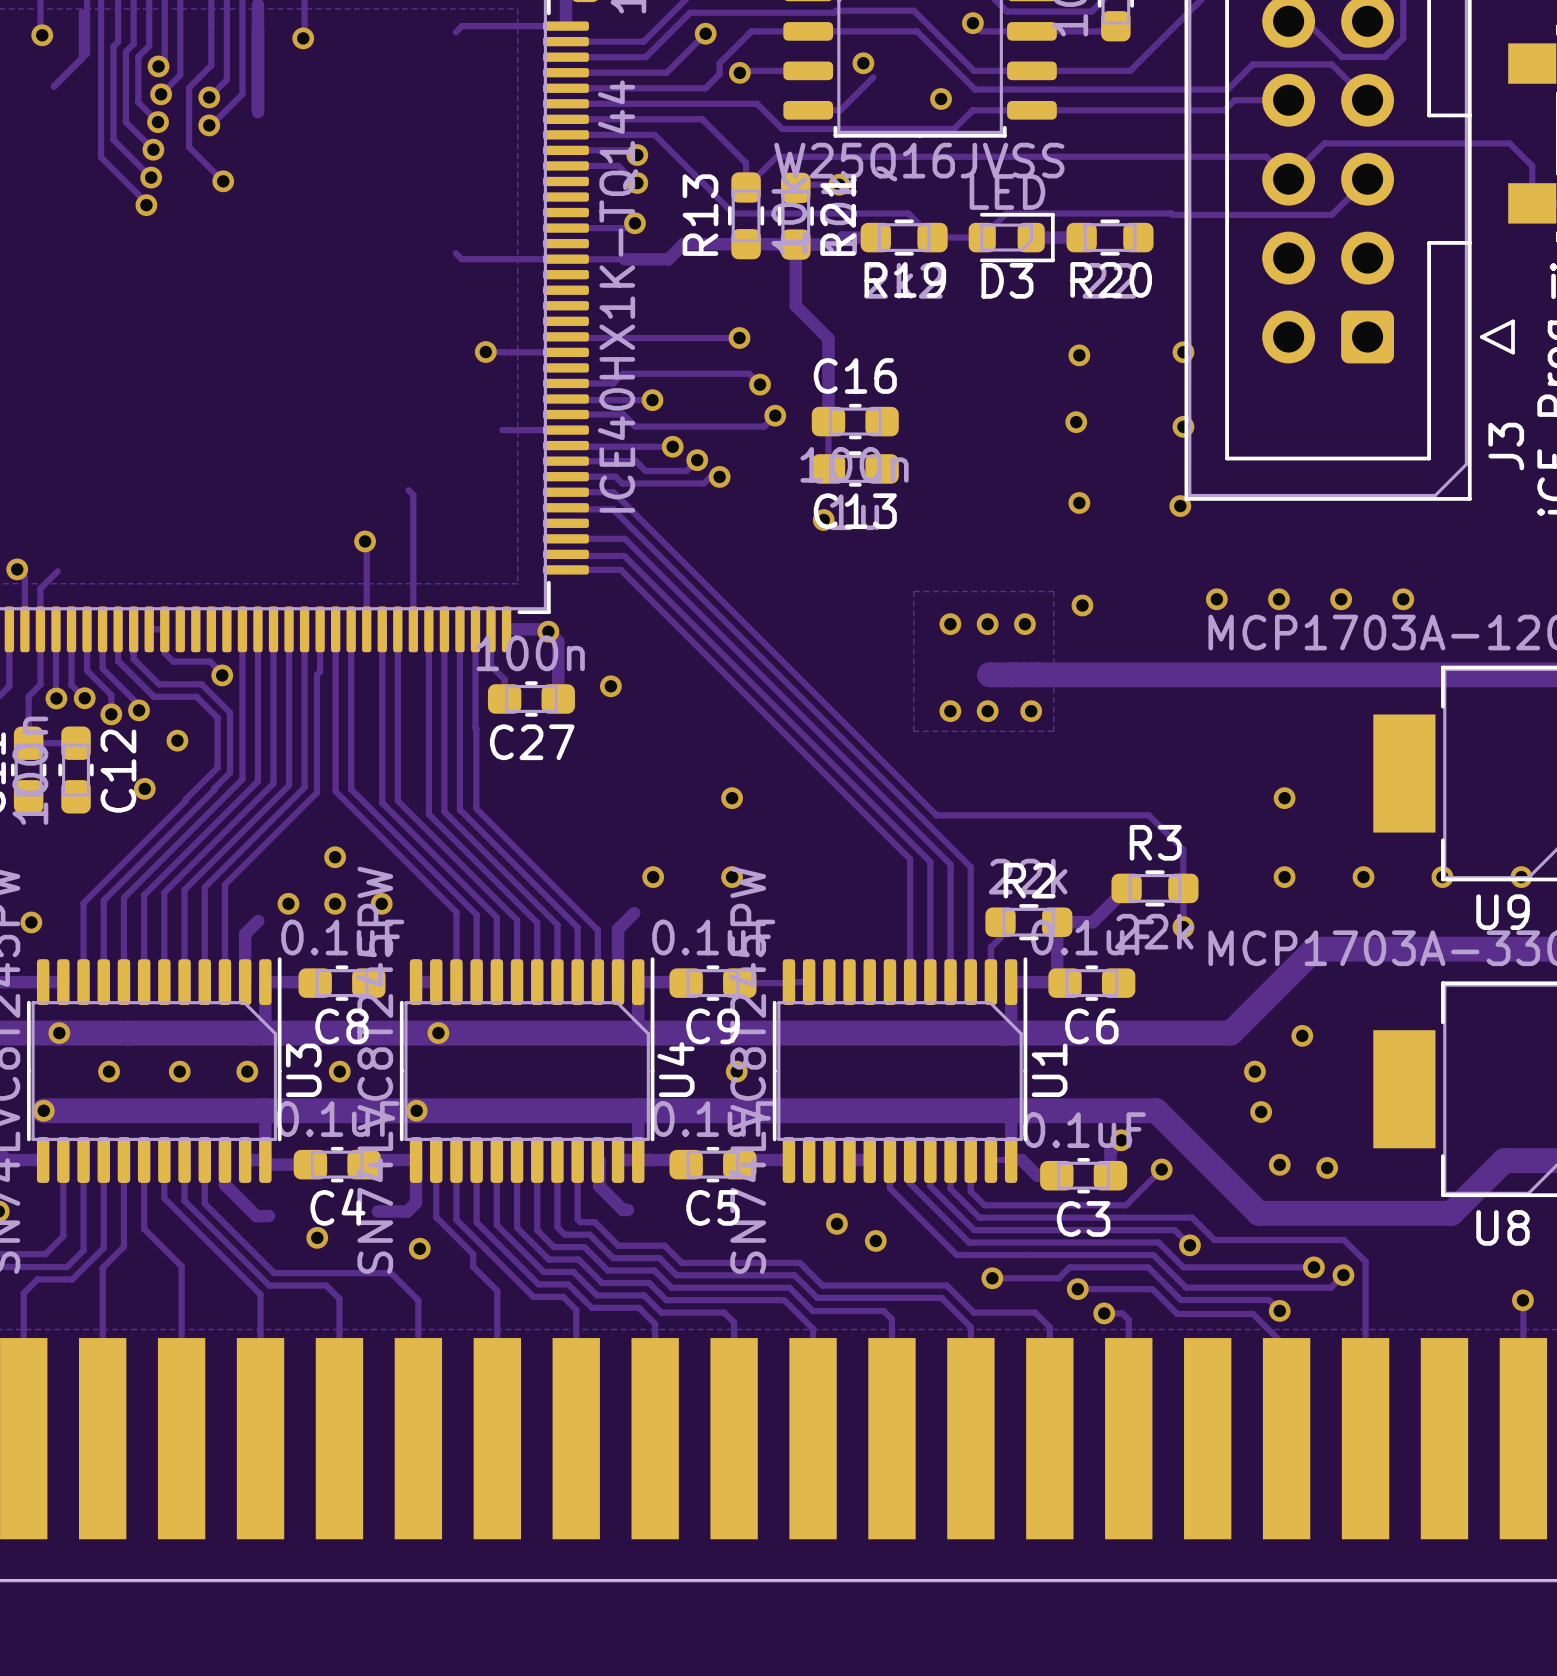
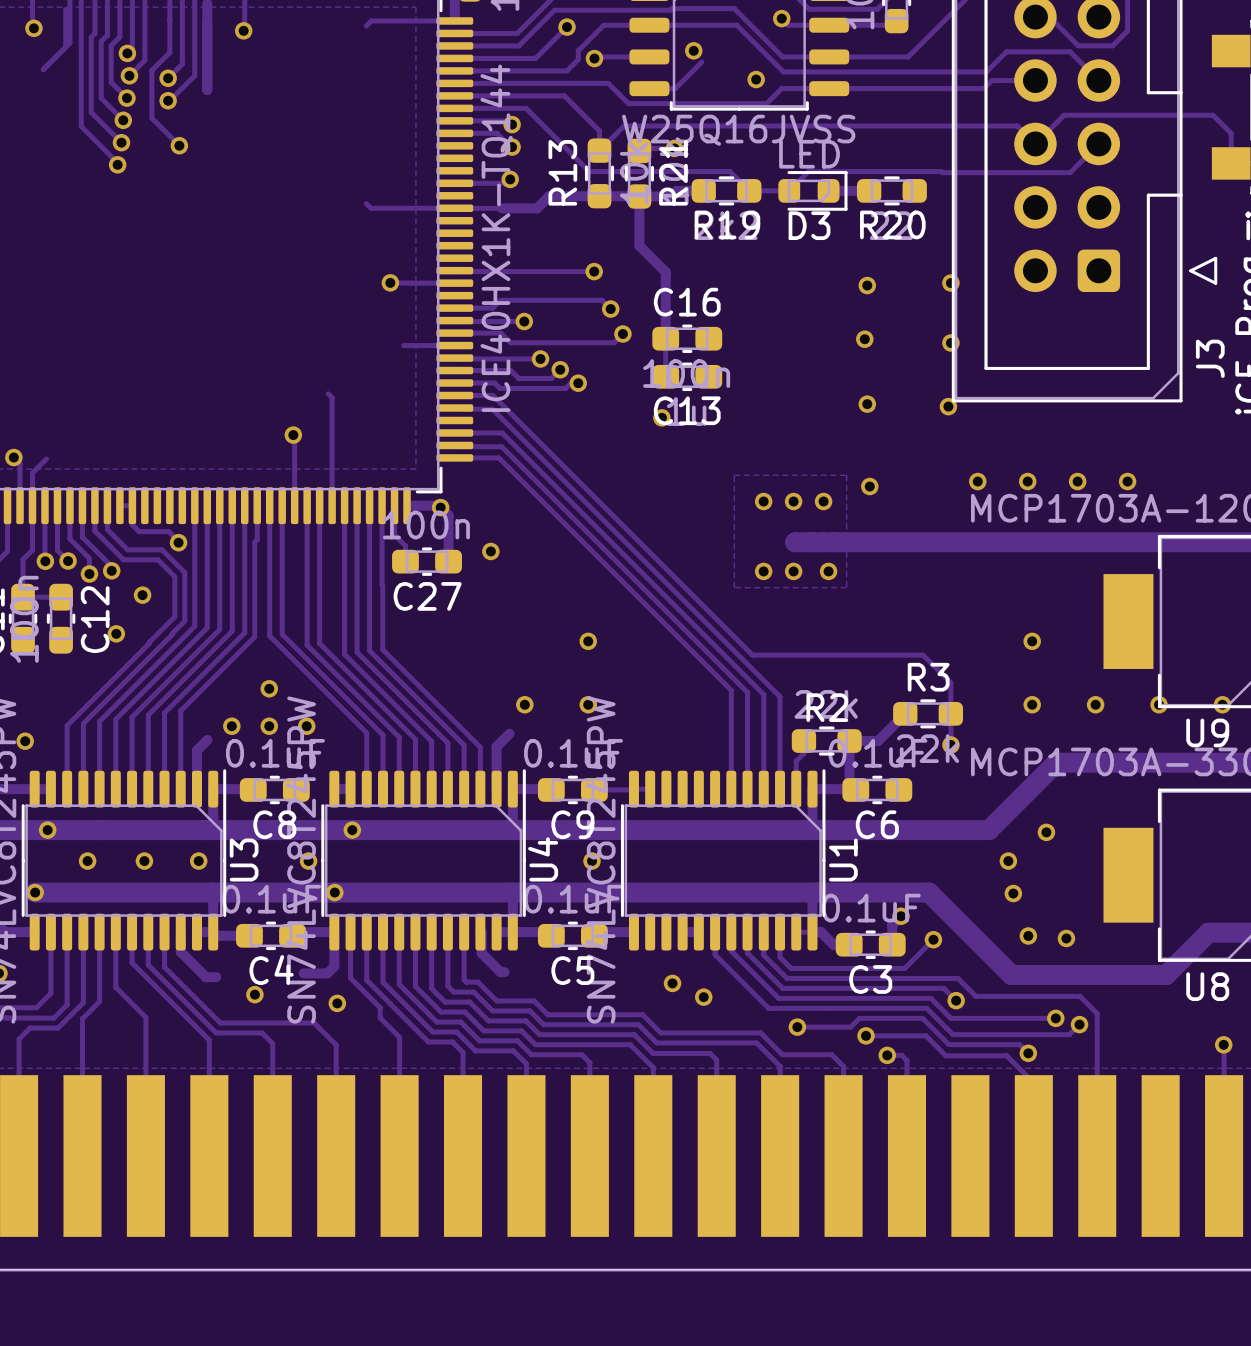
via position: (339, 1071) -> (308, 861)

